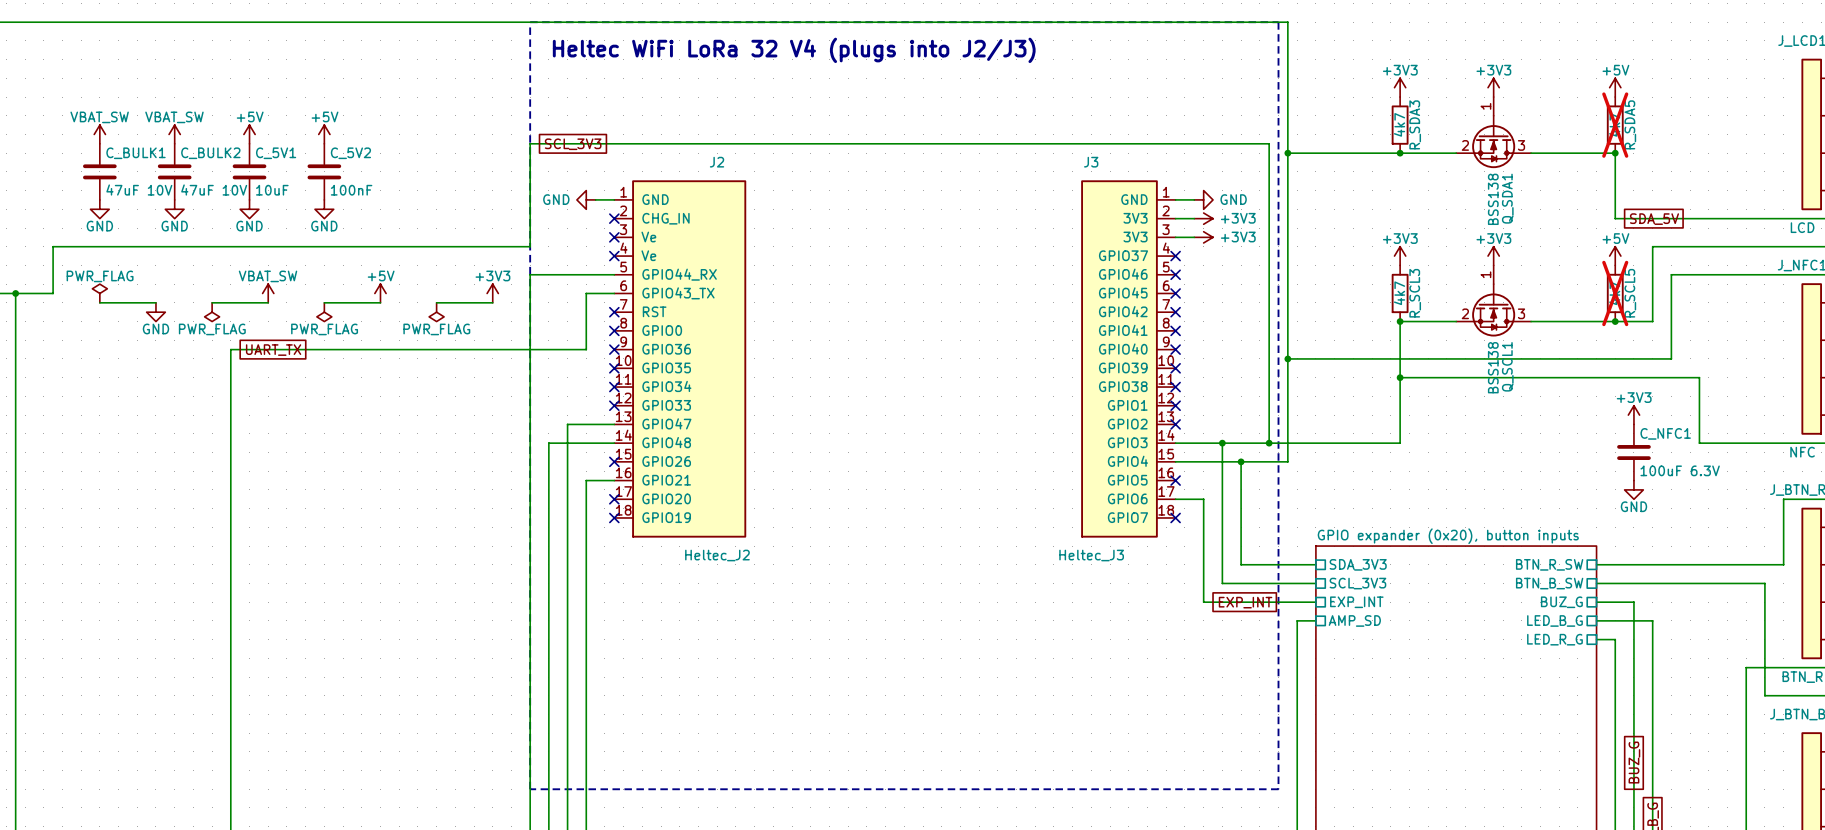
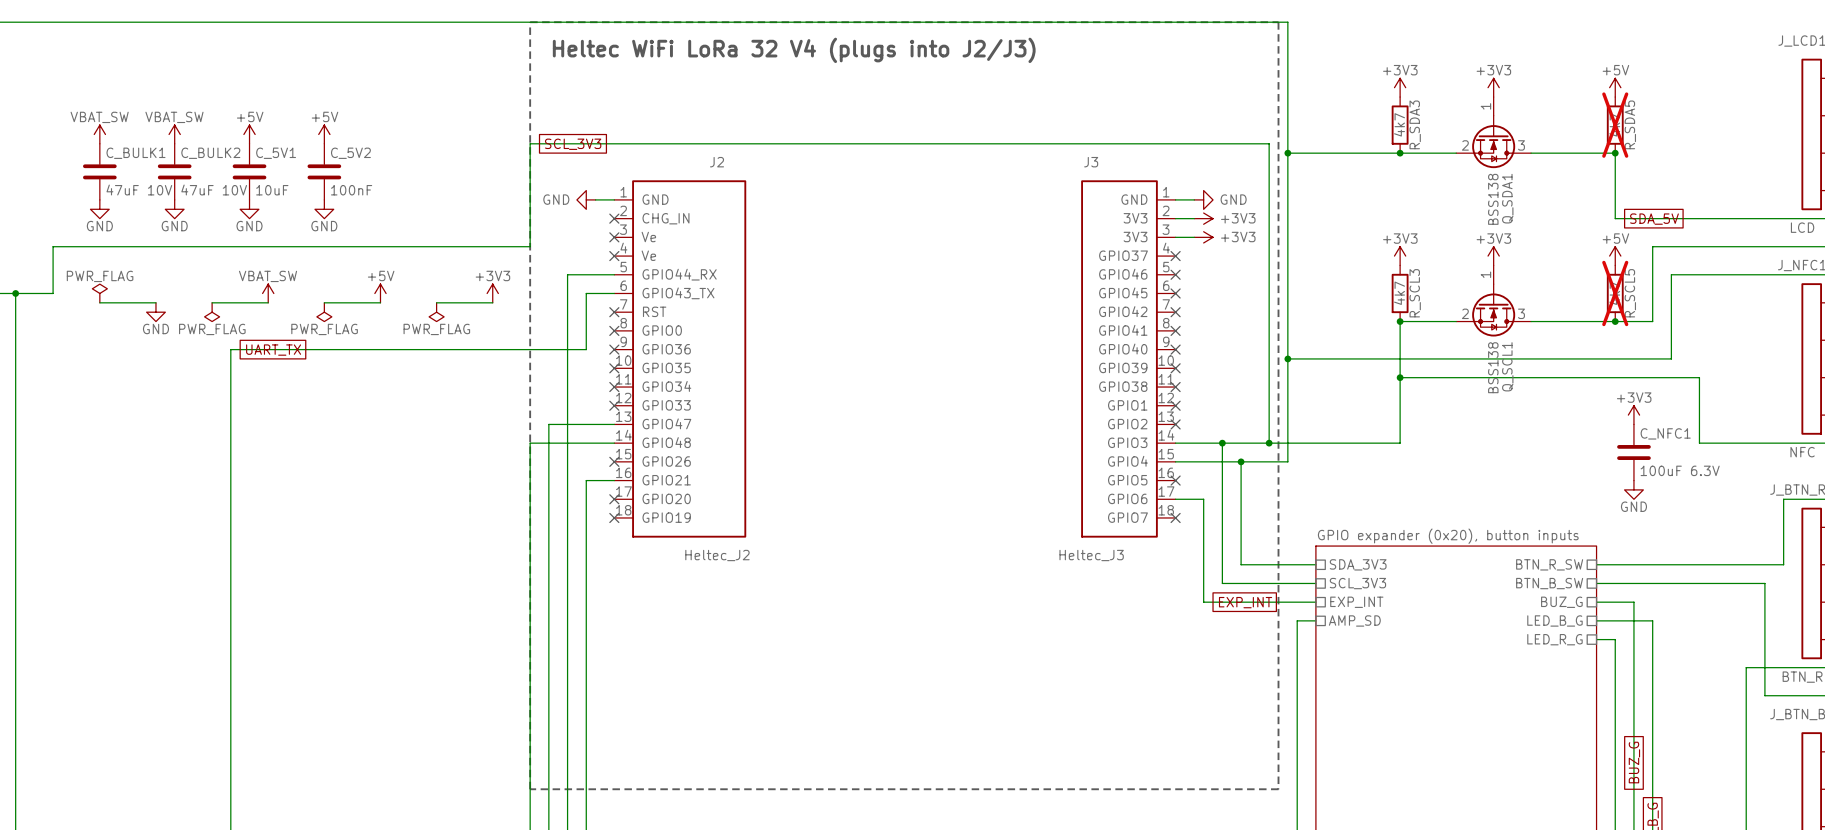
wire: (567, 274) (530, 274) (530, 443) -> (567, 274) (567, 424) (548, 424) (548, 443) (530, 443)

